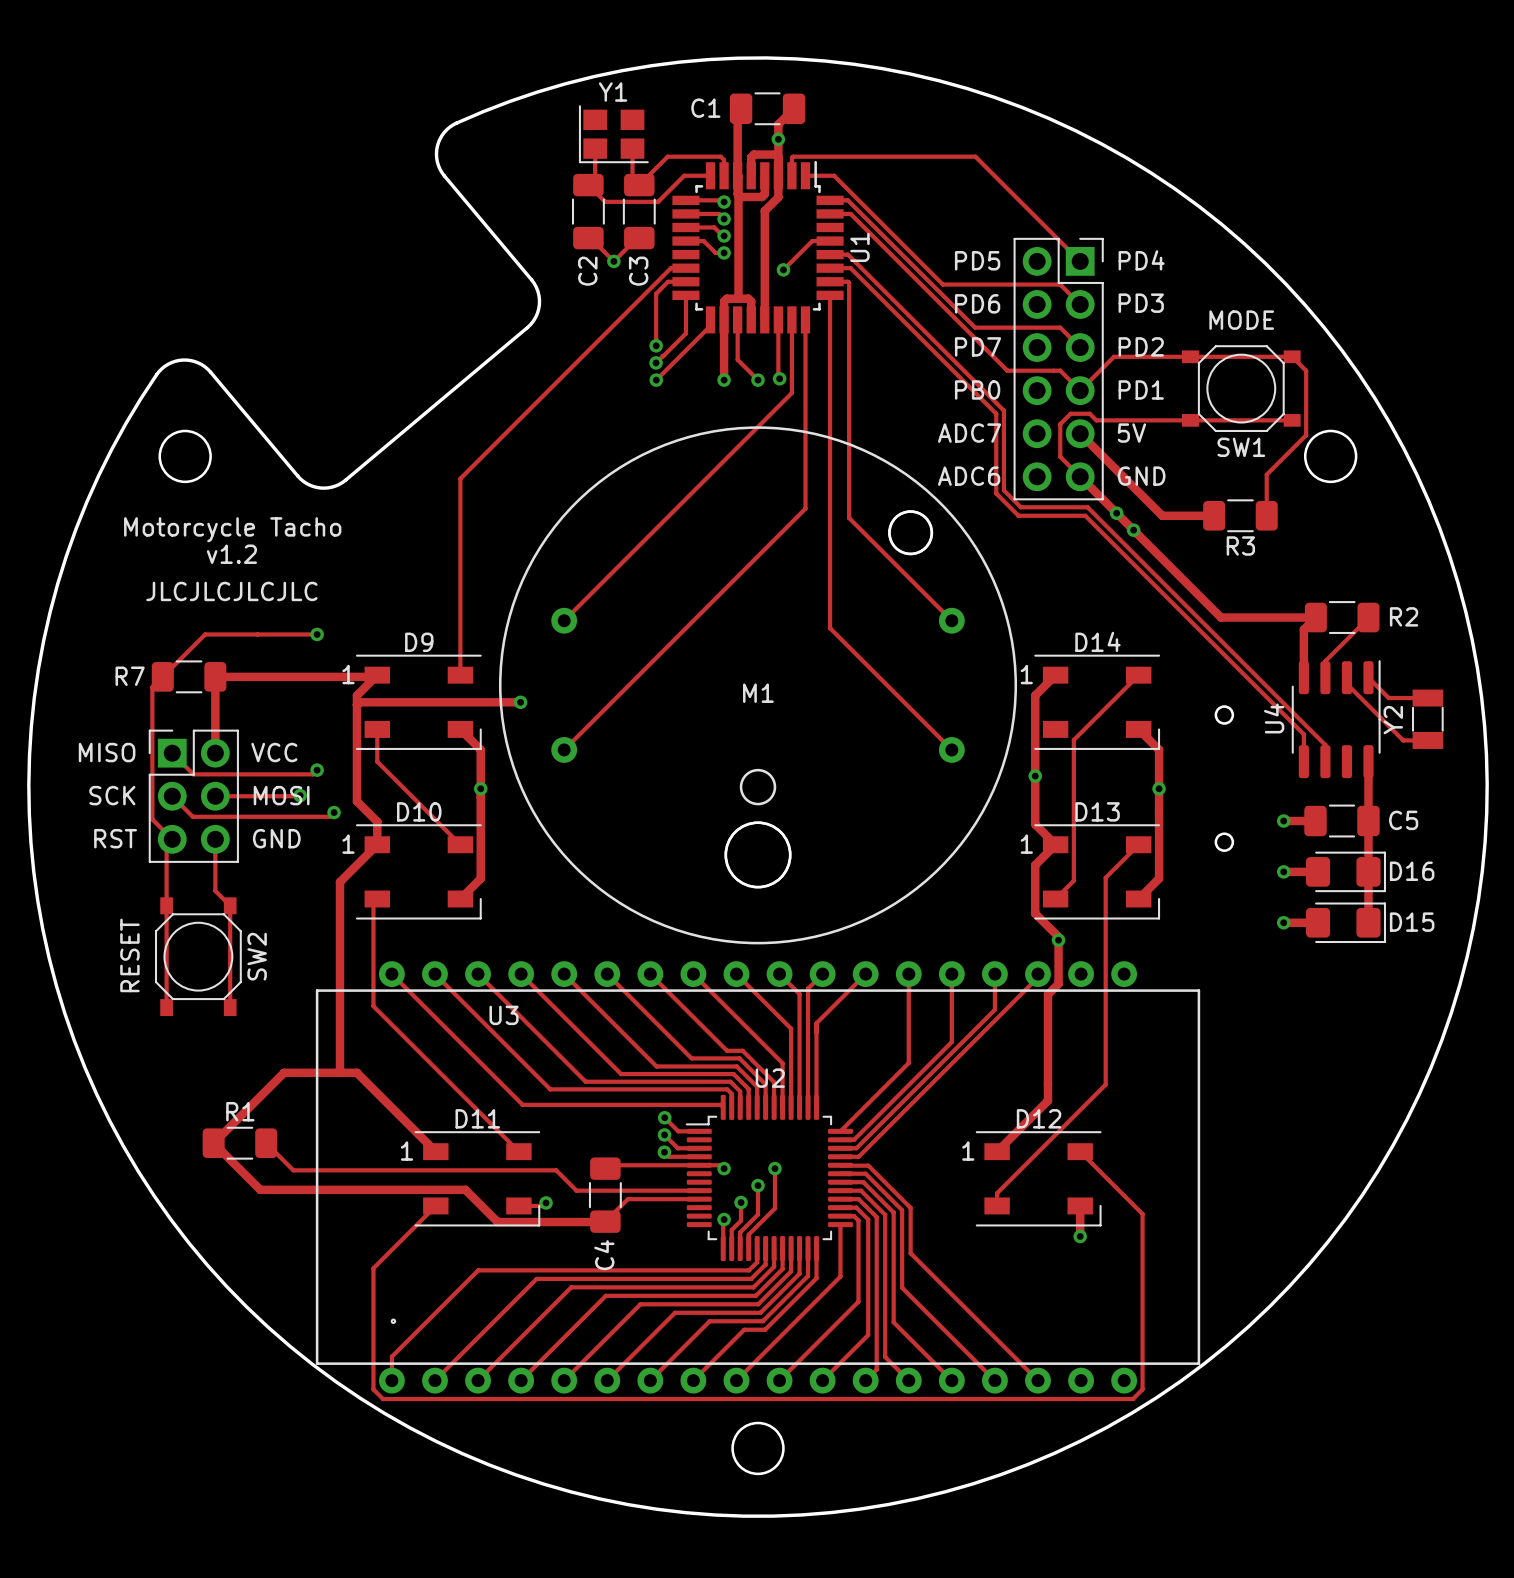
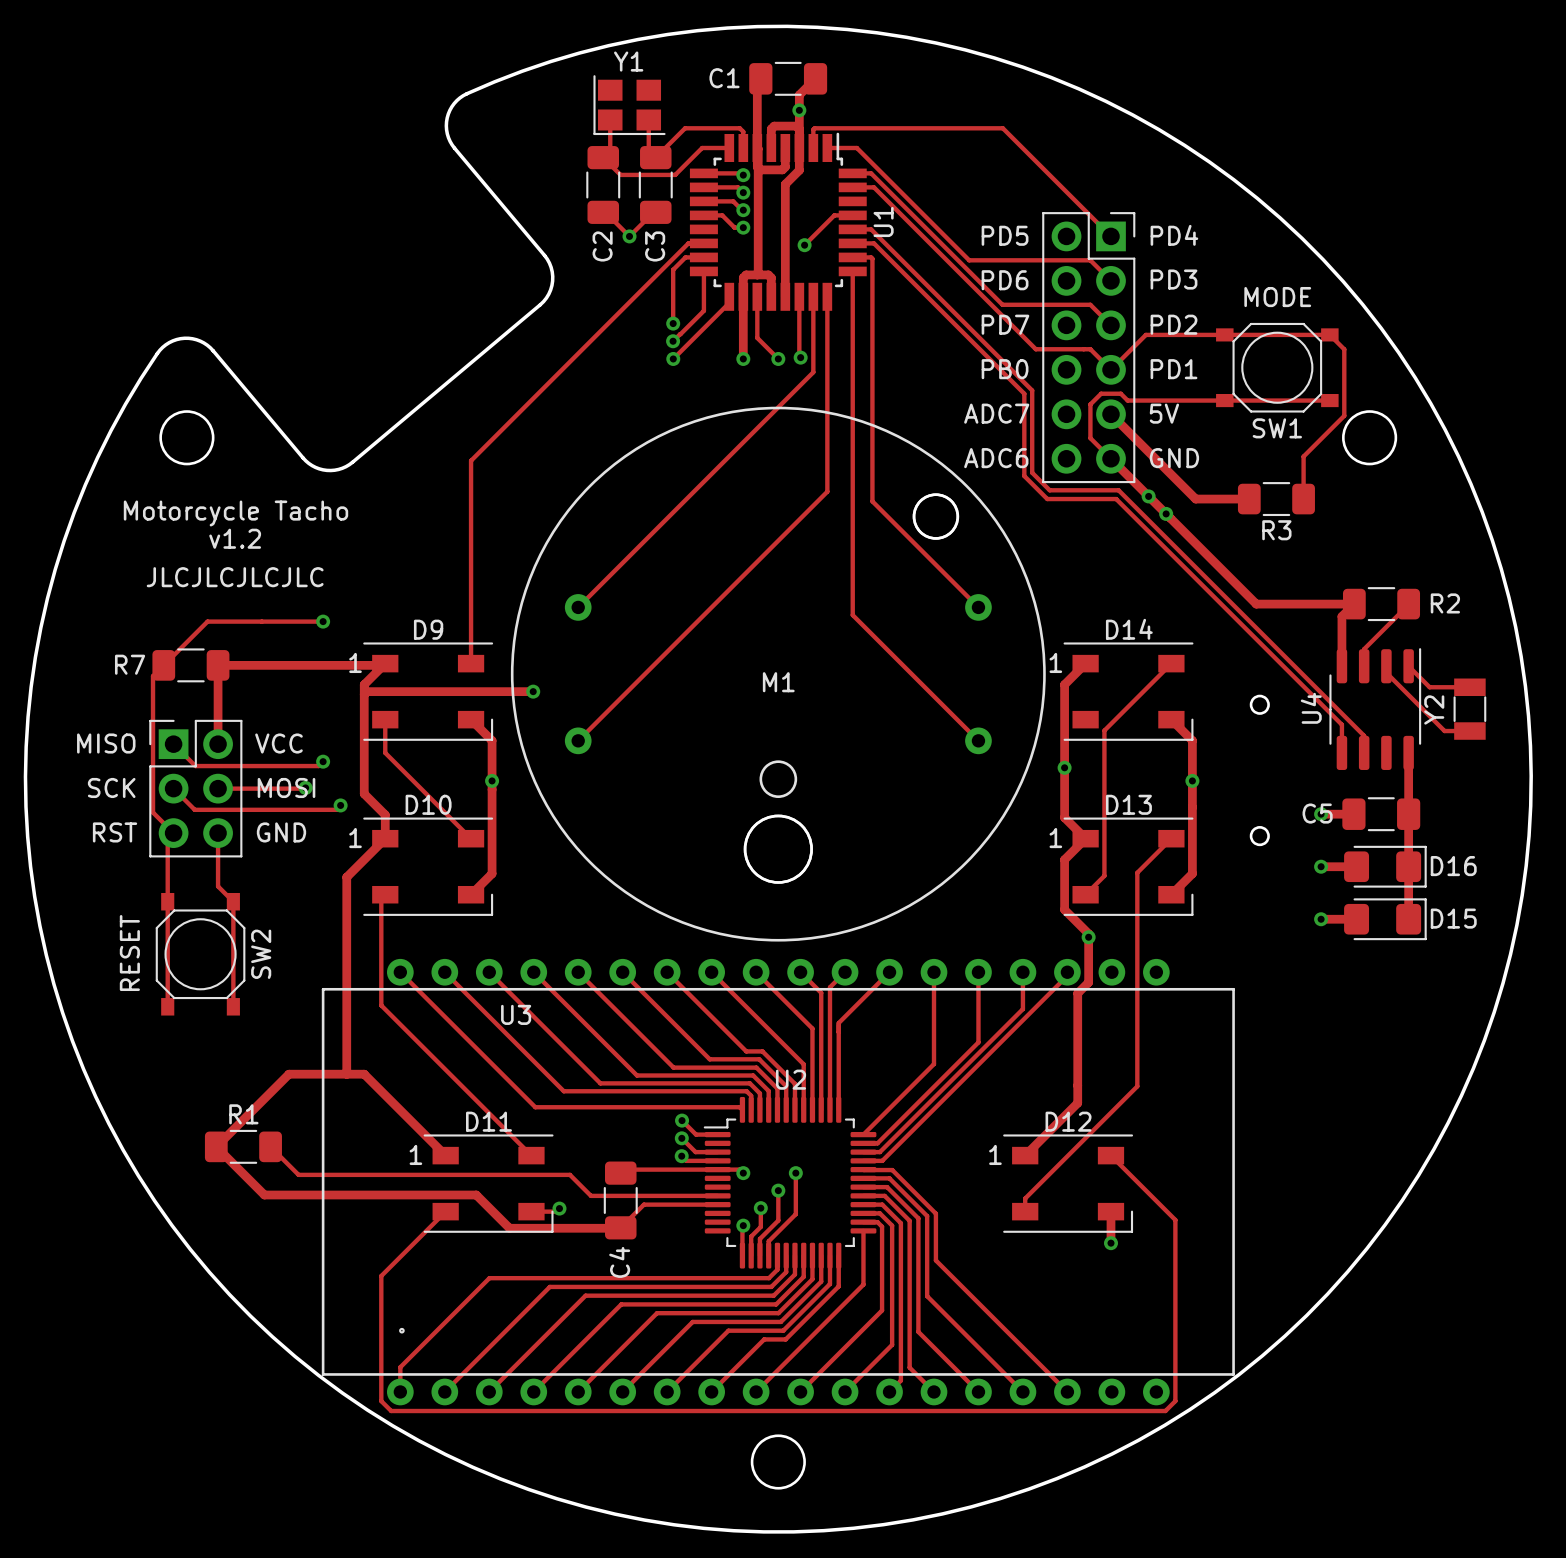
C5 name position: C5 (1403, 820) -> C5 (1317, 813)

